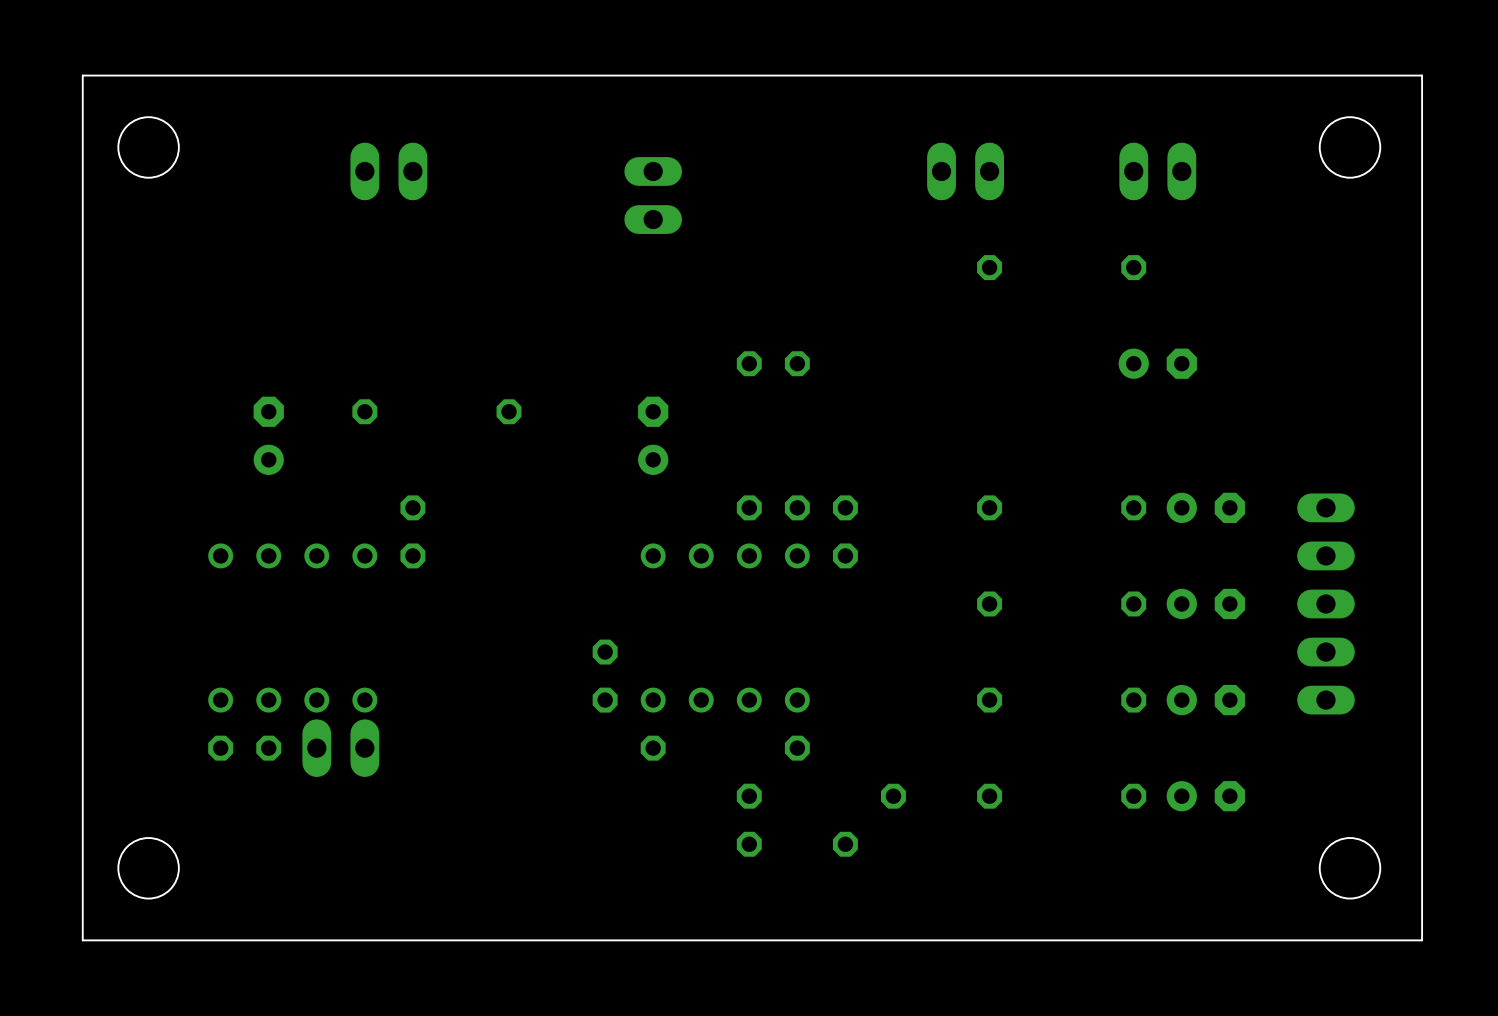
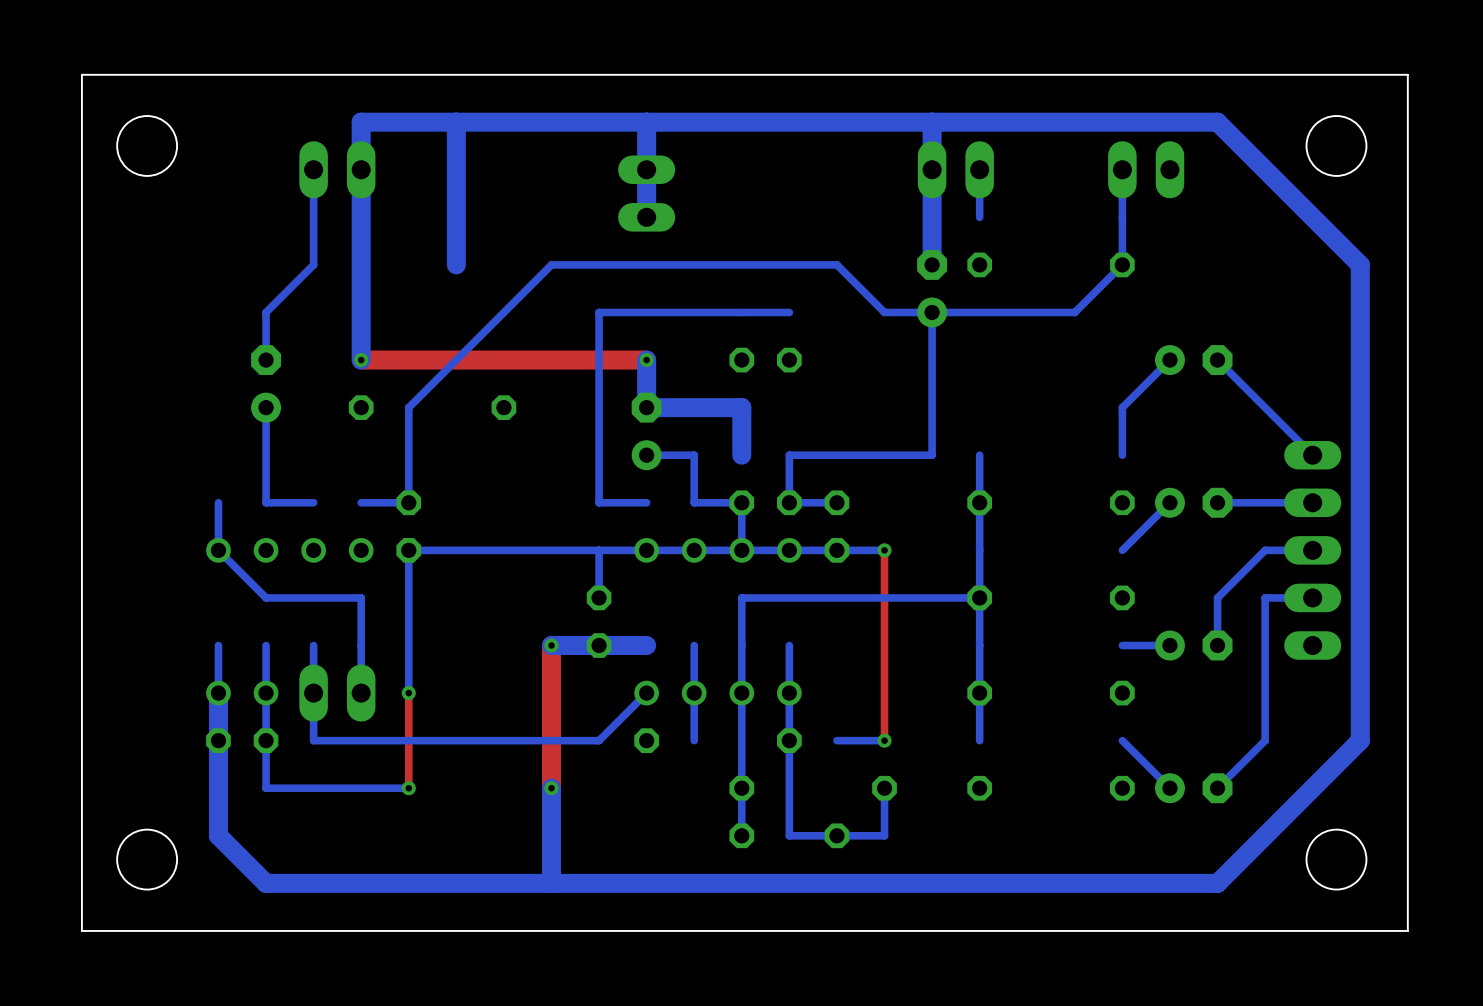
bottom track: none -> (456, 122) (456, 264)
bottom track: none -> (646, 122) (646, 217)
bottom track: none -> (932, 122) (932, 264)
bottom track: none -> (313, 169) (313, 264) (266, 312) (266, 360)
part position: (388, 171) -> (337, 169)
bottom track: none -> (979, 169) (979, 217)
bottom track: none -> (1122, 169) (1122, 264) (1074, 312) (884, 312) (836, 264) (551, 264) (408, 407) (408, 502) (361, 502)
part: none -> (932, 288)
bottom track: none -> (789, 312) (599, 312) (599, 502) (646, 502)
bottom track: none -> (932, 312) (932, 455) (789, 455) (789, 502) (836, 502)
bottom track: none -> (361, 360) (361, 122) (1217, 122) (1360, 264) (1360, 740) (1217, 883) (266, 883) (218, 835) (218, 645)
via: none -> (361, 360)
bottom track: none -> (646, 360) (646, 407) (741, 407) (741, 455)
top track: none -> (646, 360) (361, 360)
via: none -> (646, 360)
part position: (1157, 363) -> (1193, 360)
bottom track: none -> (1169, 360) (1122, 407) (1122, 455)
bottom track: none -> (1217, 360) (1312, 455)
bottom track: none -> (266, 407) (266, 502) (313, 502)
part position: (268, 435) -> (266, 383)
bottom track: none -> (646, 455) (694, 455) (694, 502) (741, 502) (741, 550)
bottom track: none -> (979, 455) (979, 740)
bottom track: none -> (218, 502) (218, 550) (266, 597) (361, 597) (361, 693)
bottom track: none -> (1169, 502) (1122, 550)
bottom track: none -> (1312, 502) (1217, 502)
bottom track: none -> (599, 550) (599, 597)
bottom track: none -> (884, 550) (408, 550) (408, 693)
top track: none -> (884, 550) (884, 740)
via: none -> (884, 550)
bottom track: none -> (1312, 550) (1265, 550) (1217, 597) (1217, 645)
bottom track: none -> (979, 597) (741, 597) (741, 835)
part: (1205, 603) -> none
bottom track: none -> (1312, 597) (1265, 597) (1265, 740) (1217, 788)
part position: (1325, 603) -> (1312, 550)
bottom track: none -> (266, 645) (266, 788) (408, 788)
bottom track: none -> (313, 645) (313, 740) (599, 740) (646, 693)
top track: none -> (551, 645) (551, 788)
via: none -> (551, 645)
bottom track: none -> (646, 645) (551, 645)
bottom track: none -> (694, 645) (694, 740)
bottom track: none -> (789, 645) (789, 835) (884, 835) (884, 788)
bottom track: none -> (1169, 645) (1122, 645)
part: none -> (1193, 645)
part position: (605, 676) -> (599, 621)
top track: none -> (408, 693) (408, 788)
via: none -> (408, 693)
part: (1205, 700) -> none
part position: (340, 748) -> (337, 693)
bottom track: none -> (884, 740) (836, 740)
via: none -> (884, 740)
bottom track: none -> (1122, 740) (1169, 788)
via: none -> (408, 788)
bottom track: none -> (551, 788) (551, 883)
via: none -> (551, 788)

